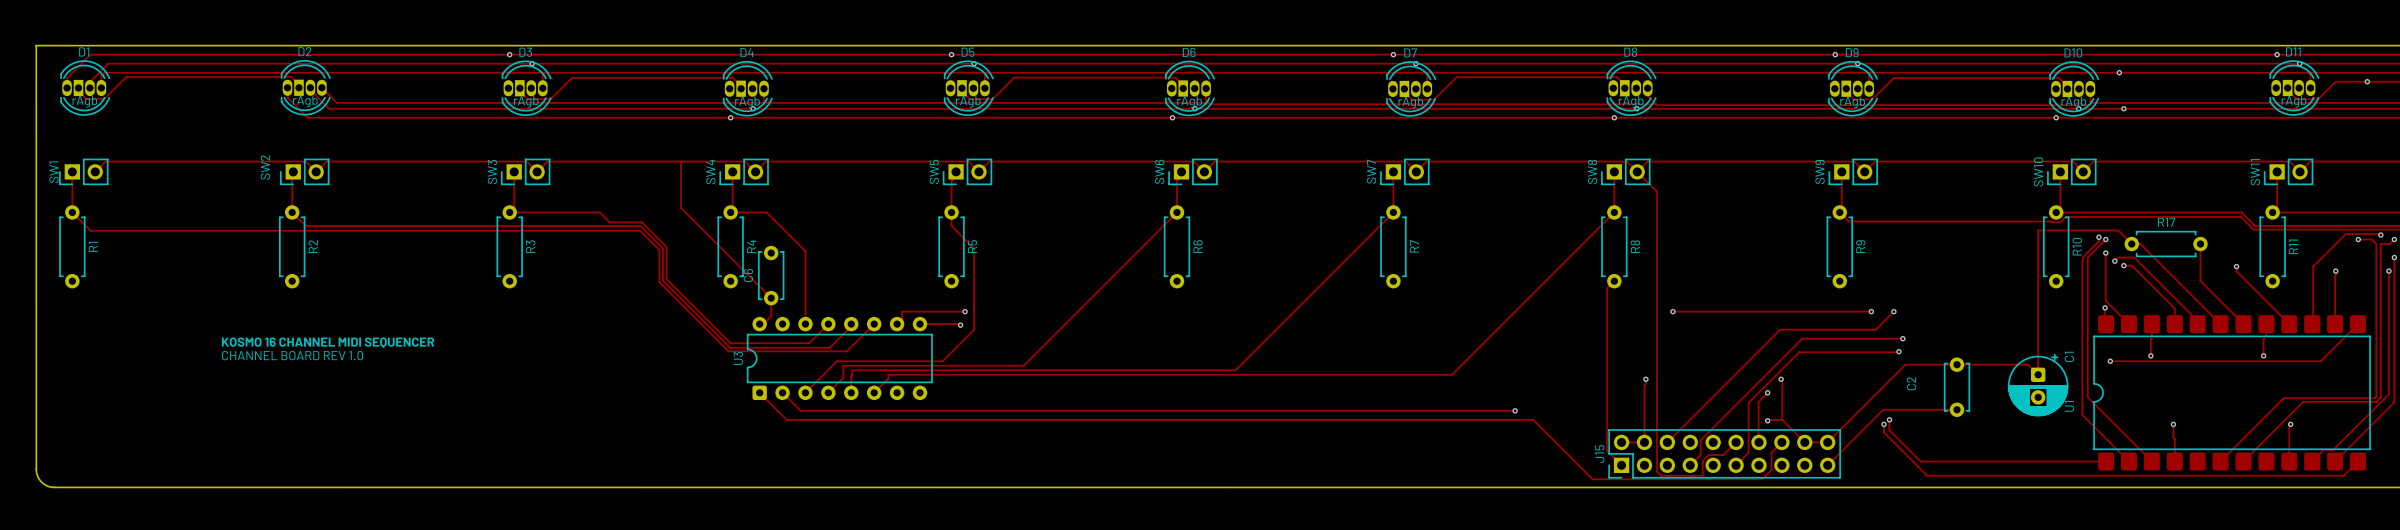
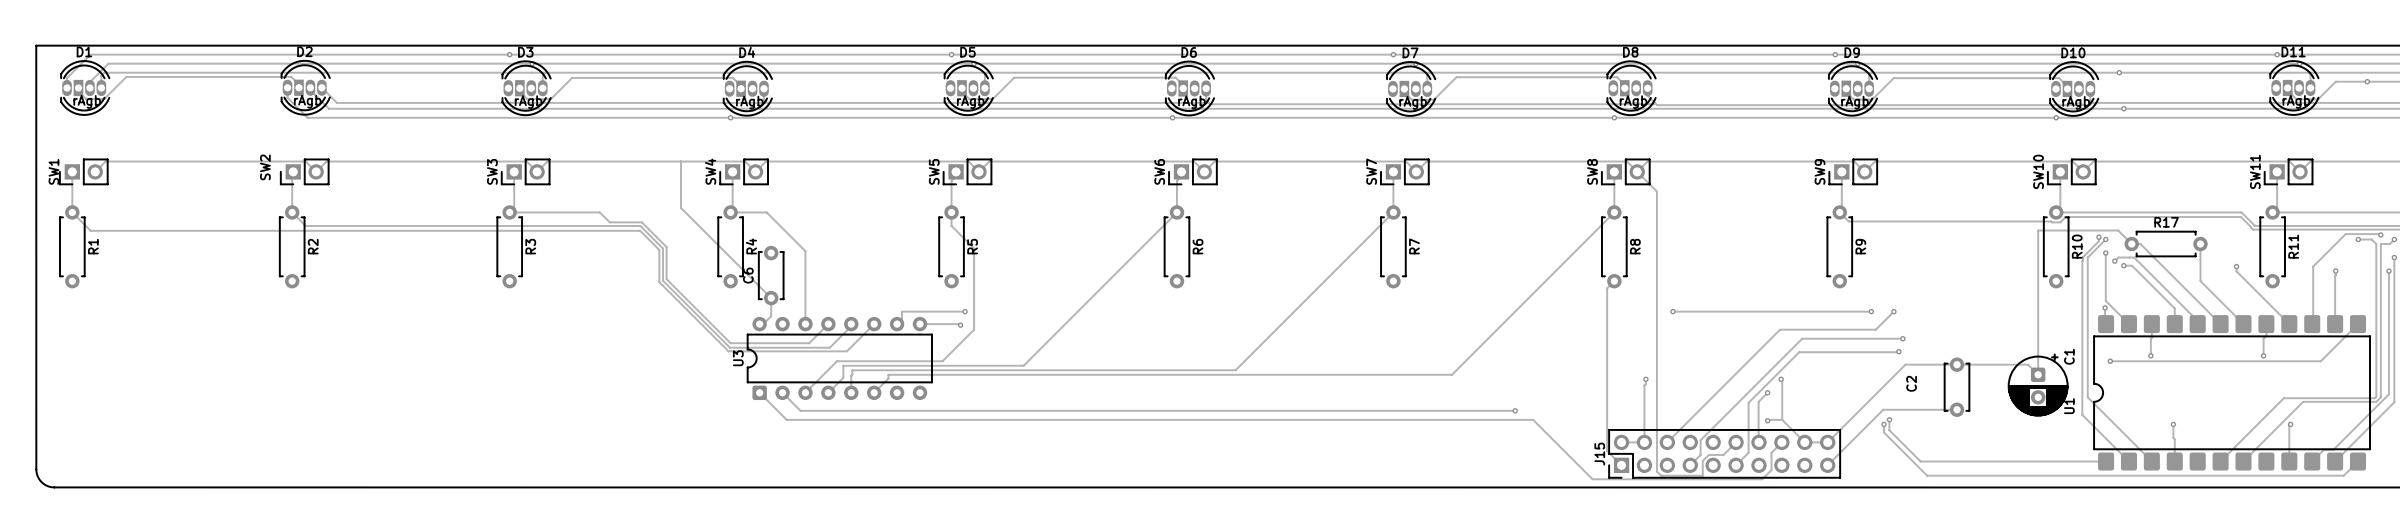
text: KOSMO 16 CHANNEL MIDI SEQUENCER (328, 342) -> none
text: CHANNEL BOARD REV 1.0 (292, 355) -> none

